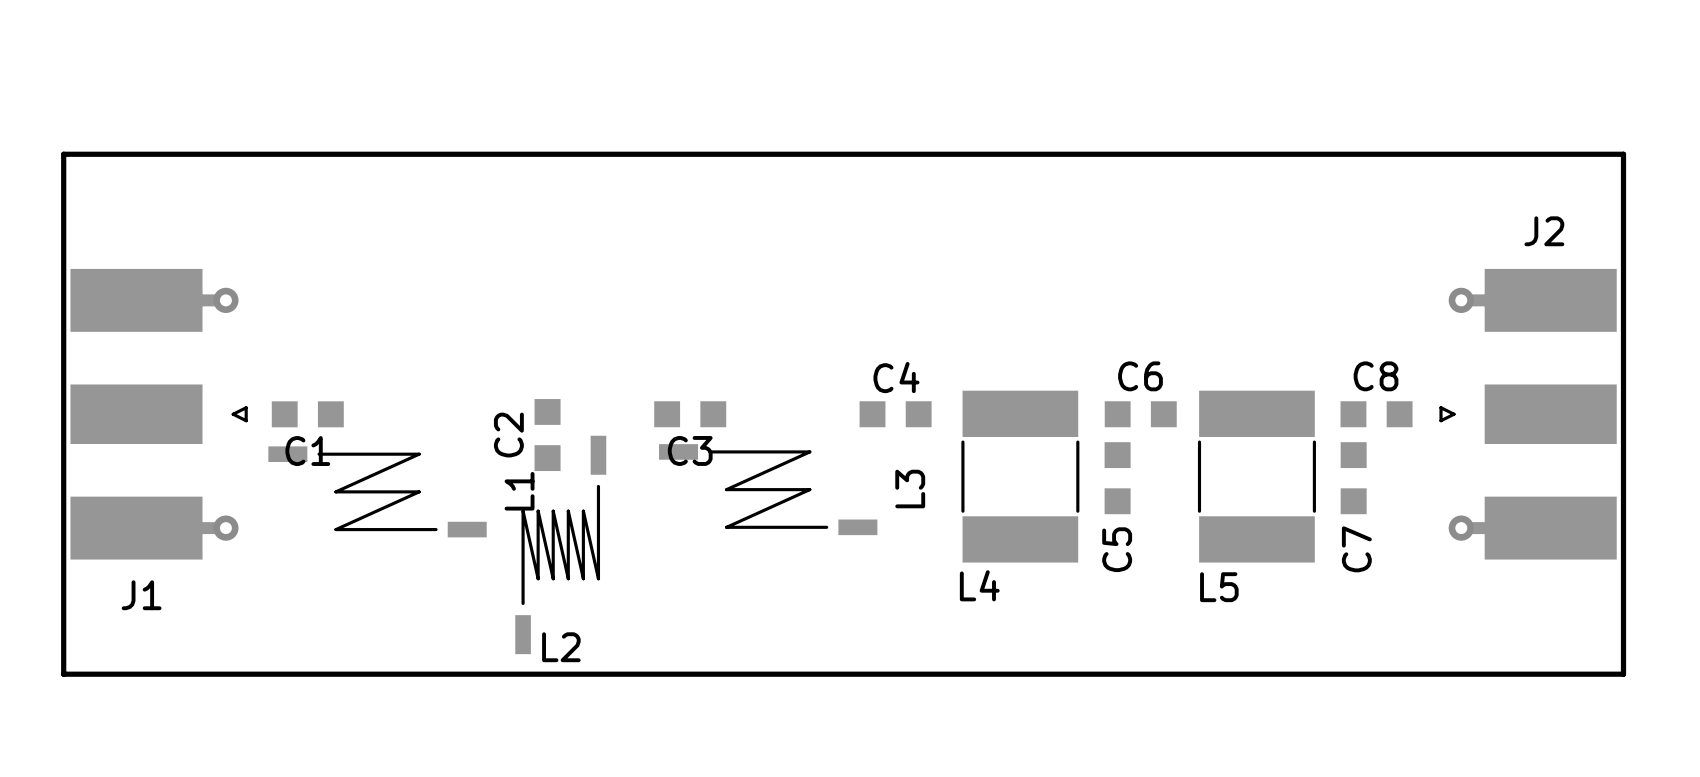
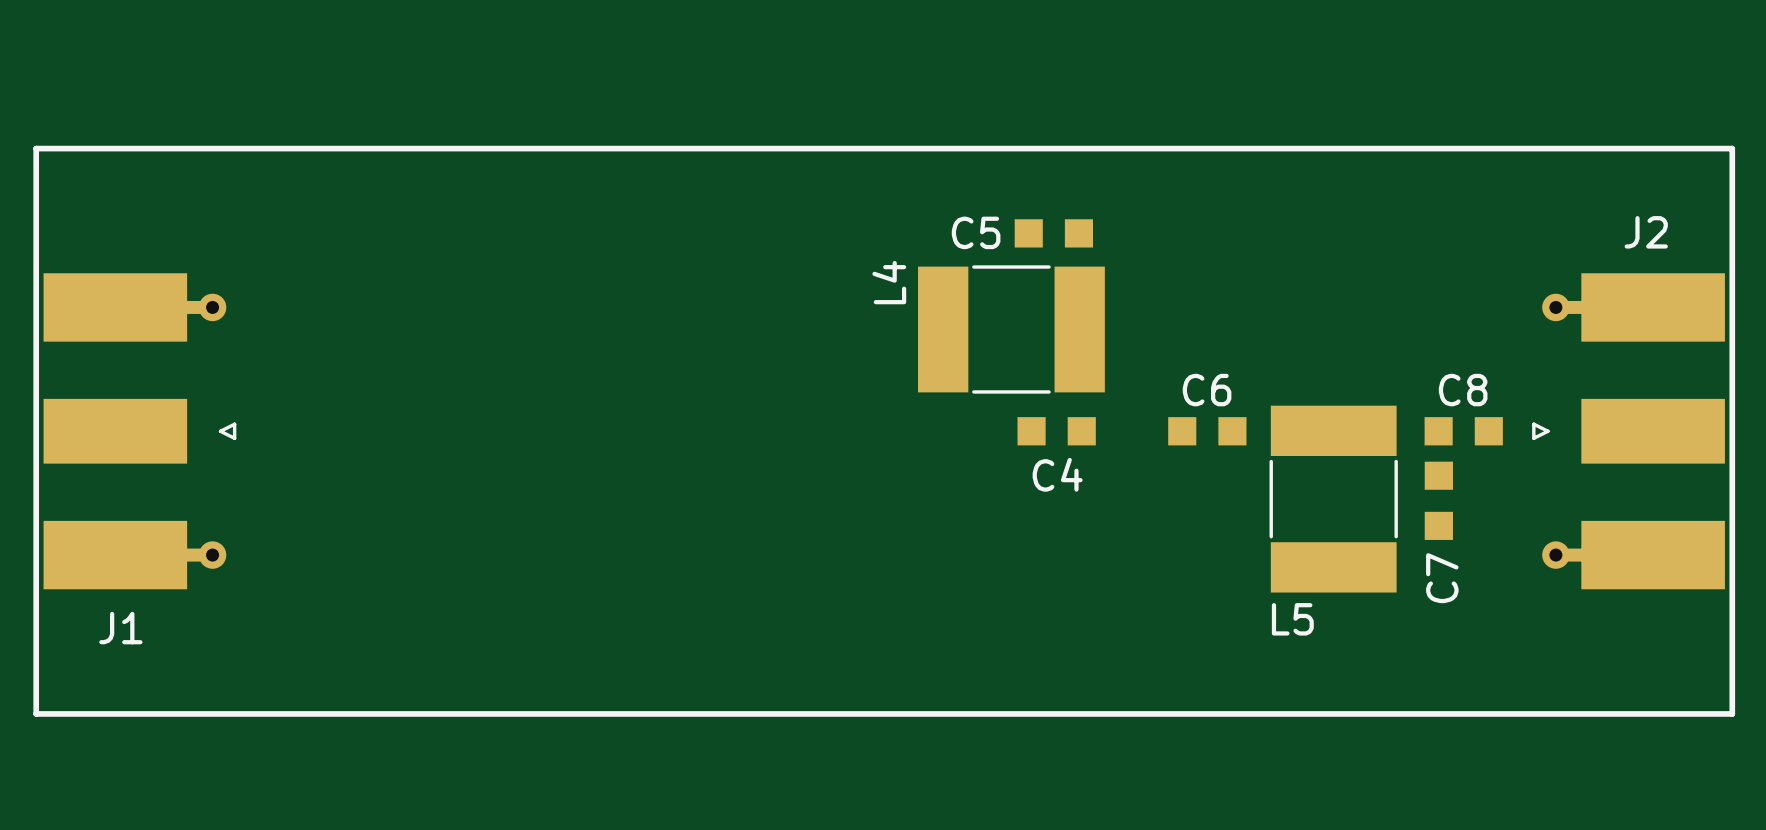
C4 name position: C4 (896, 377) -> C4 (1057, 474)
C1: (307, 414) -> none
C3: (690, 414) -> none
C4 position: (895, 414) -> (1056, 431)
C2: (547, 435) -> none
L4 rotation: 0° (1020, 476) -> 90° clockwise (1011, 329)
L4 position: (1020, 476) -> (1011, 329)
C5 rotation: 0° (1117, 478) -> 90° clockwise (1053, 233)
C5 position: (1117, 478) -> (1053, 233)
L3: (768, 489) -> none
L1: (377, 491) -> none
L2: (560, 544) -> none

